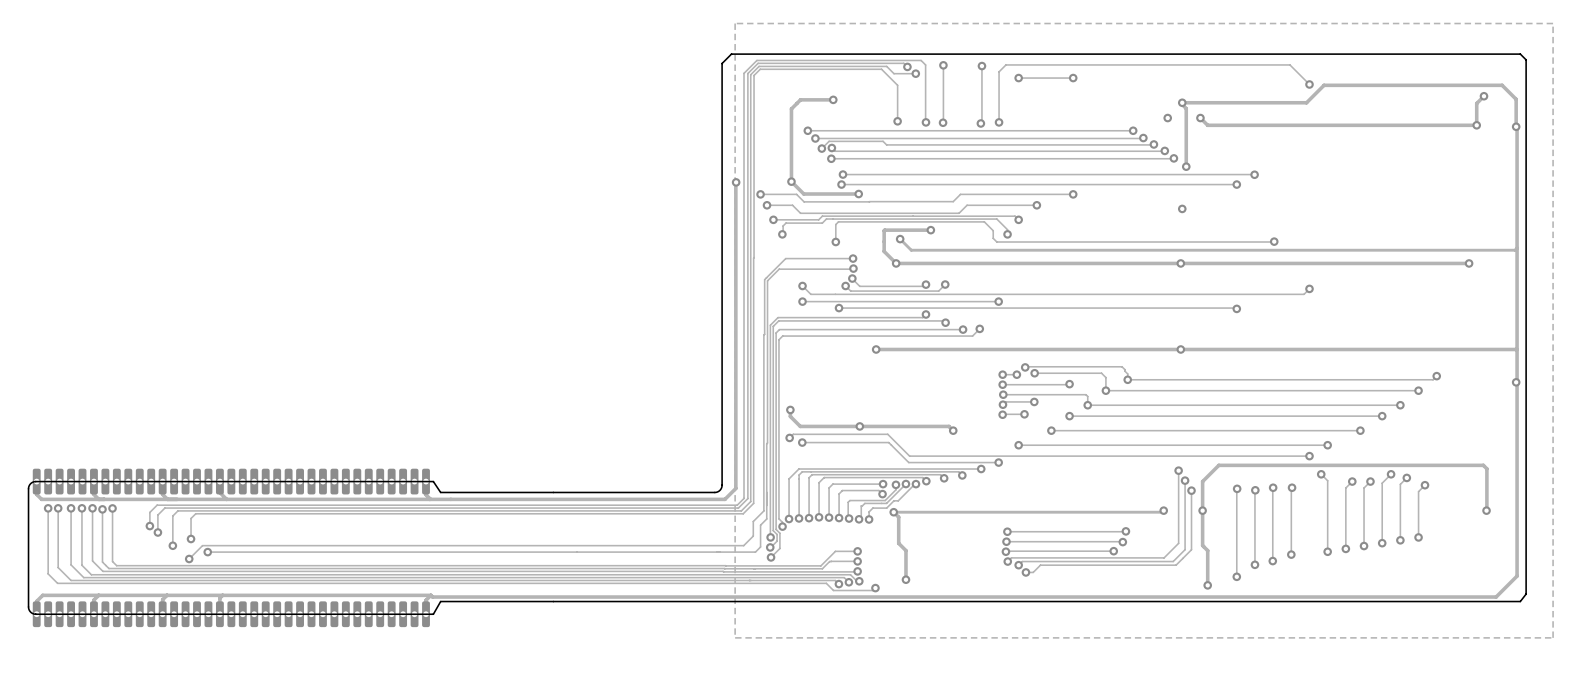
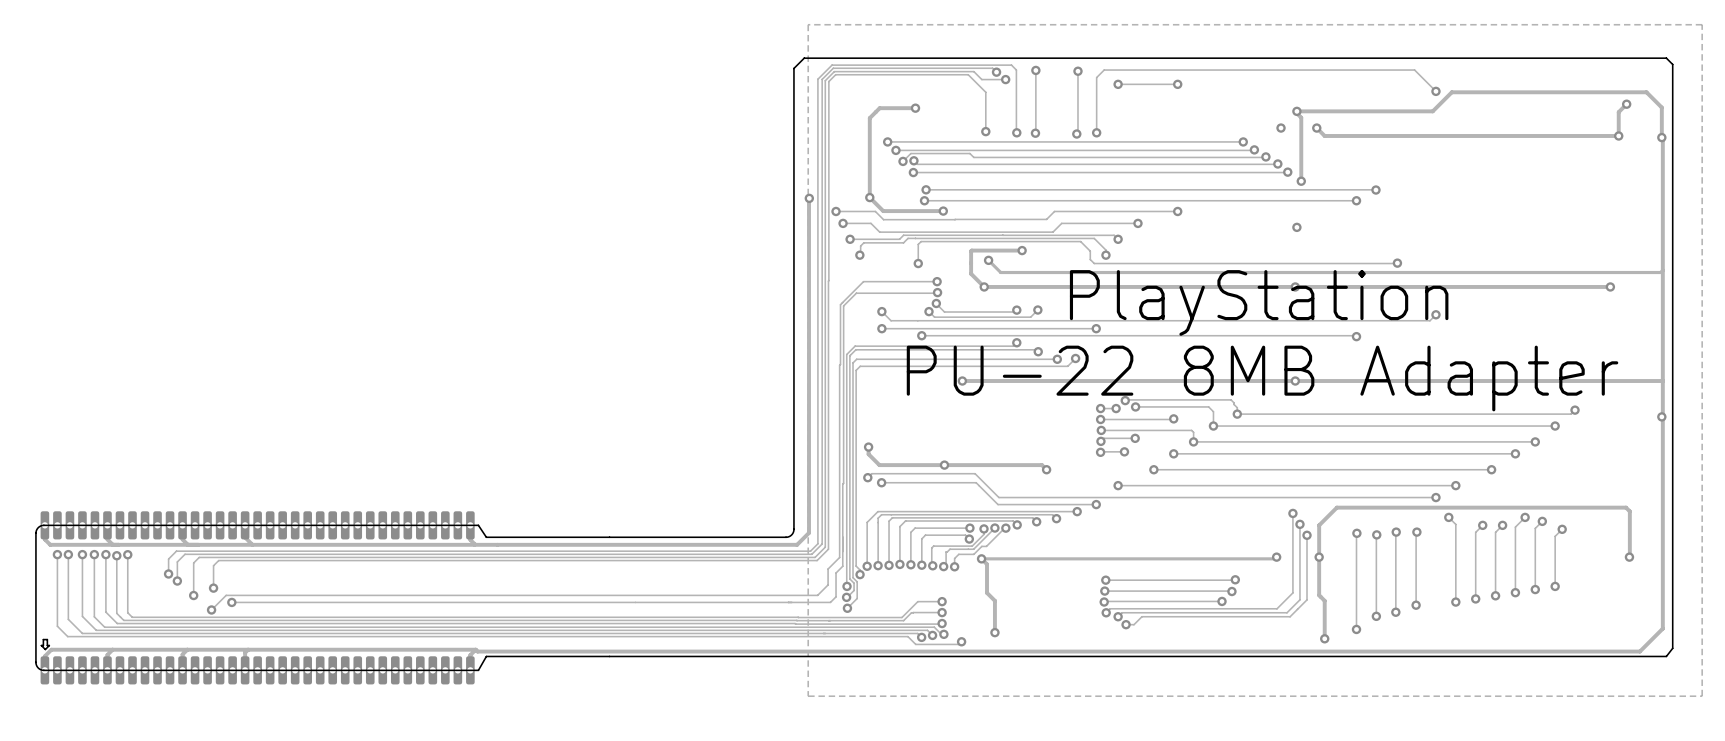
text: none -> PlayStation (1259, 302)
text: none -> PU-22 8MB Adapter (1262, 378)
line: none -> (43, 639) (47, 639) (47, 645) (49, 645) (45, 649) (41, 645) (43, 645) (43, 639)

